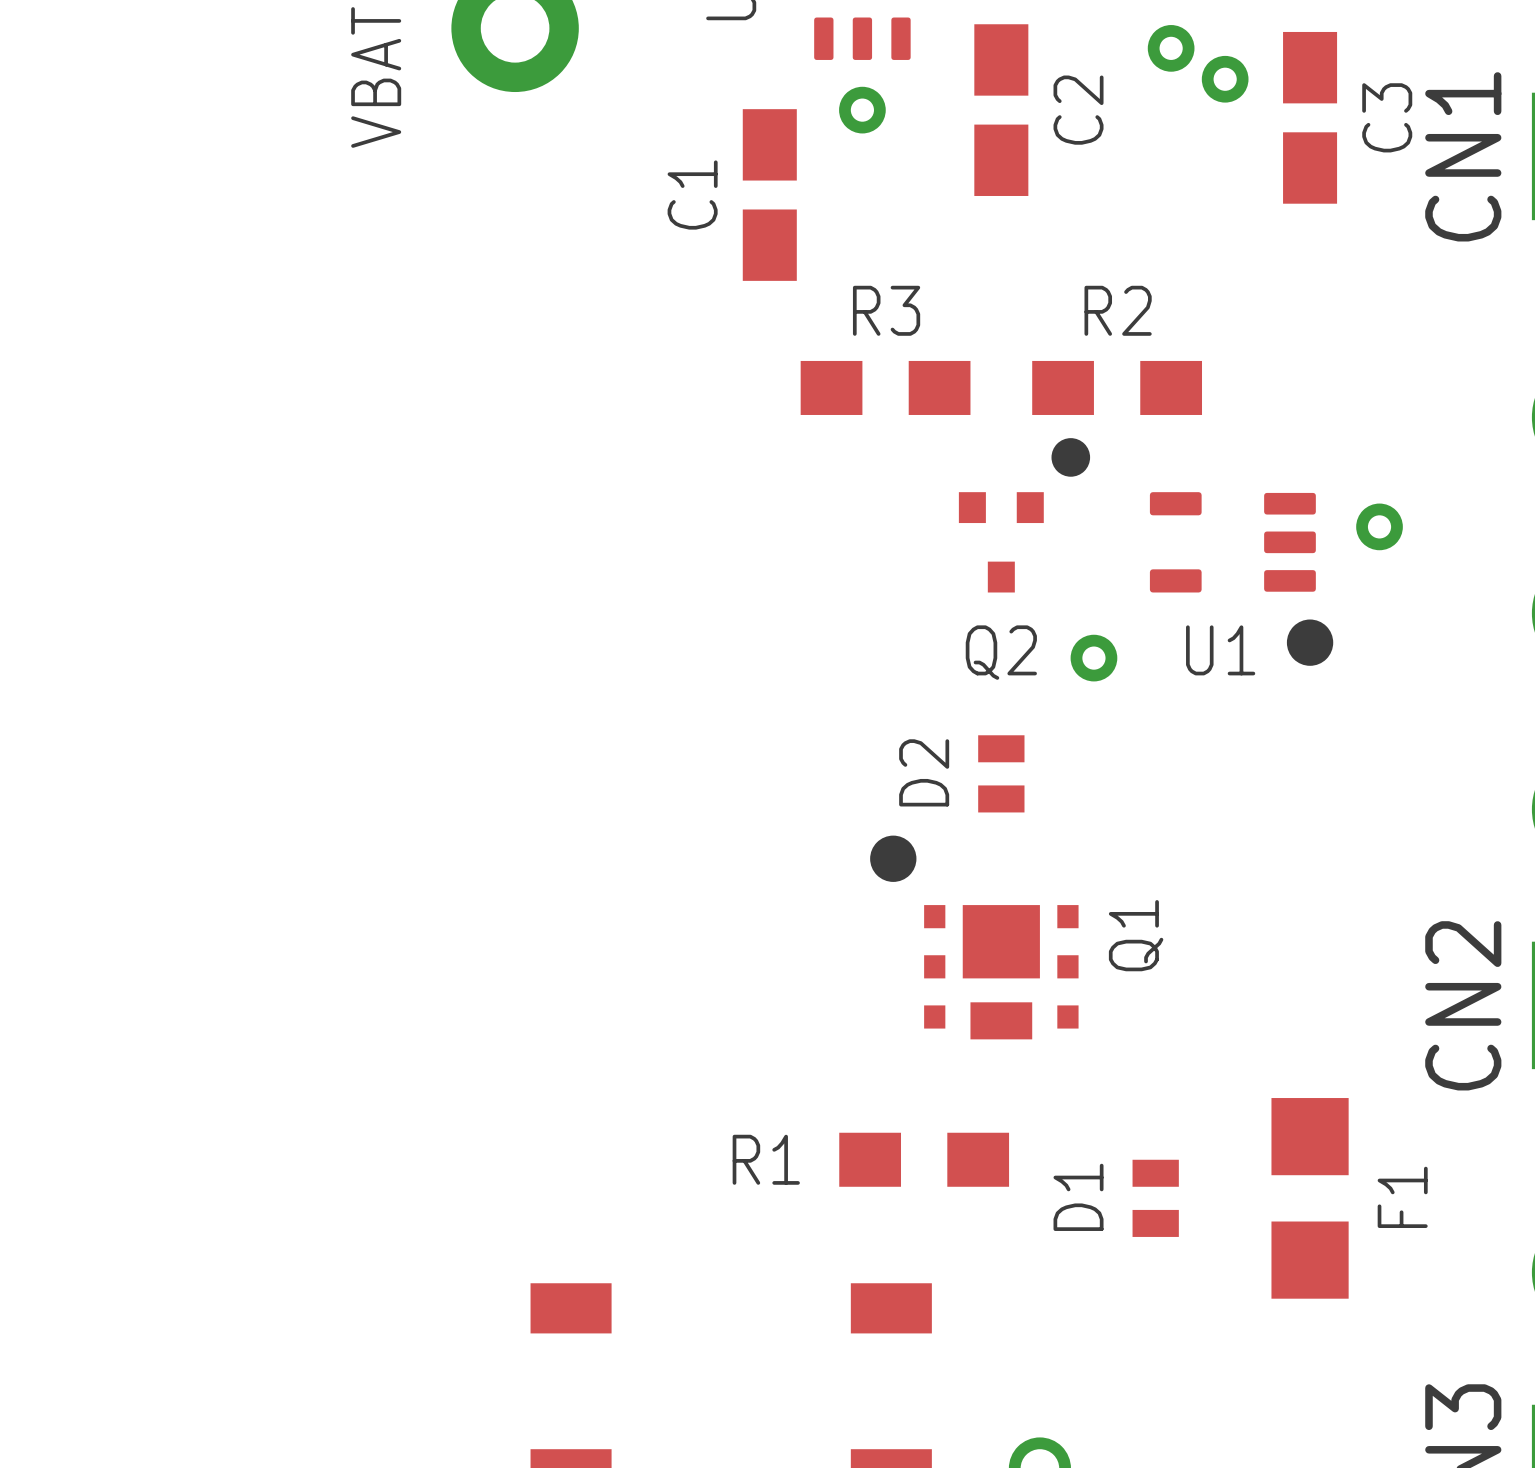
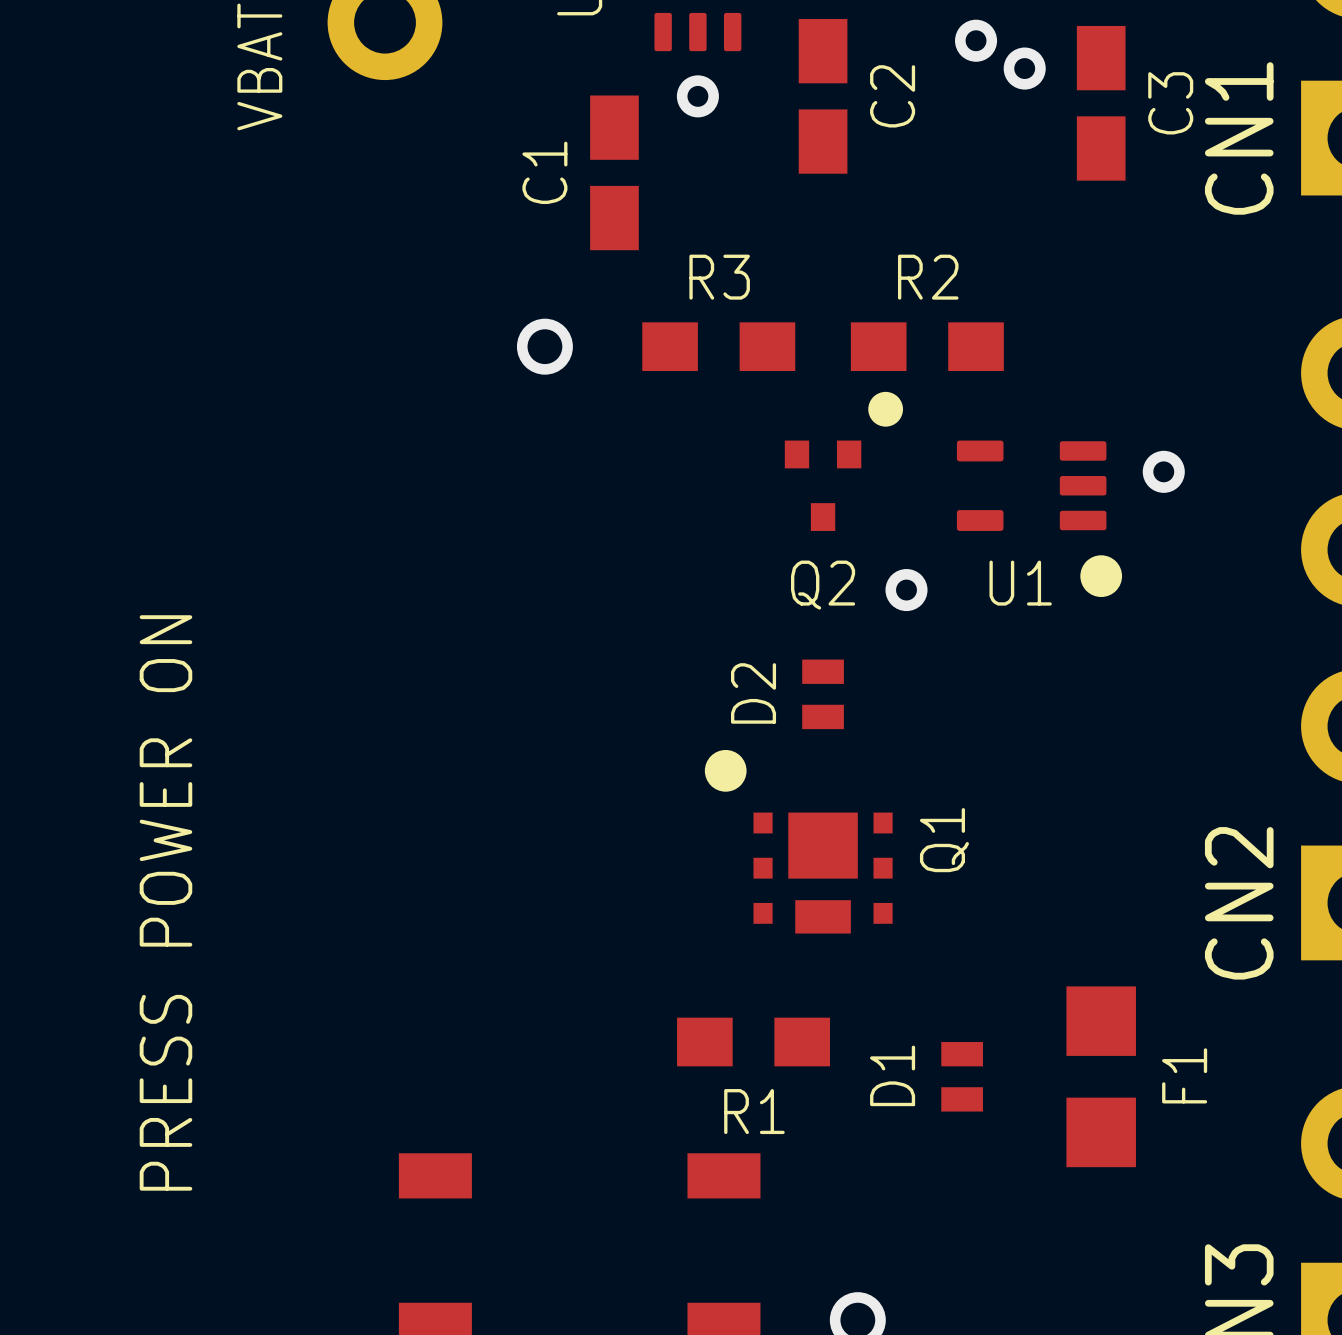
via: none -> (544, 346)
text: none -> PRESS POWER ON (165, 902)
R1 name position: R1 (766, 1159) -> R1 (754, 1111)

